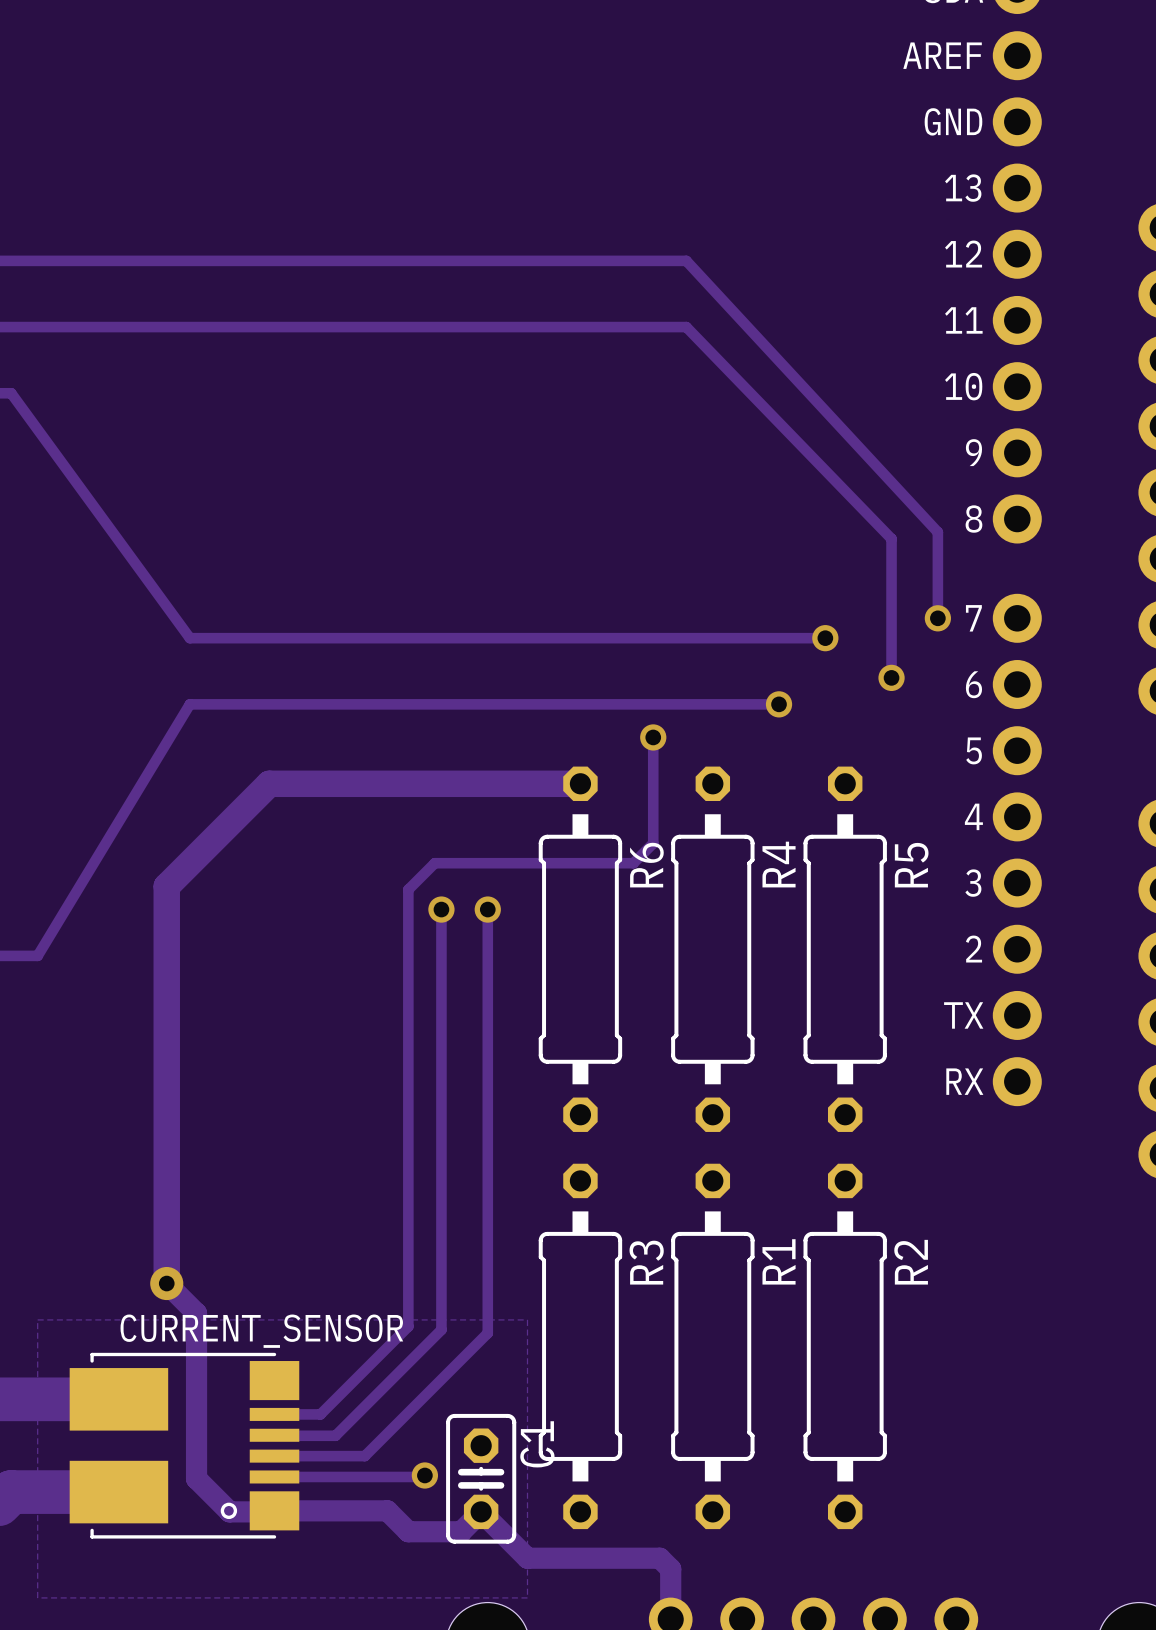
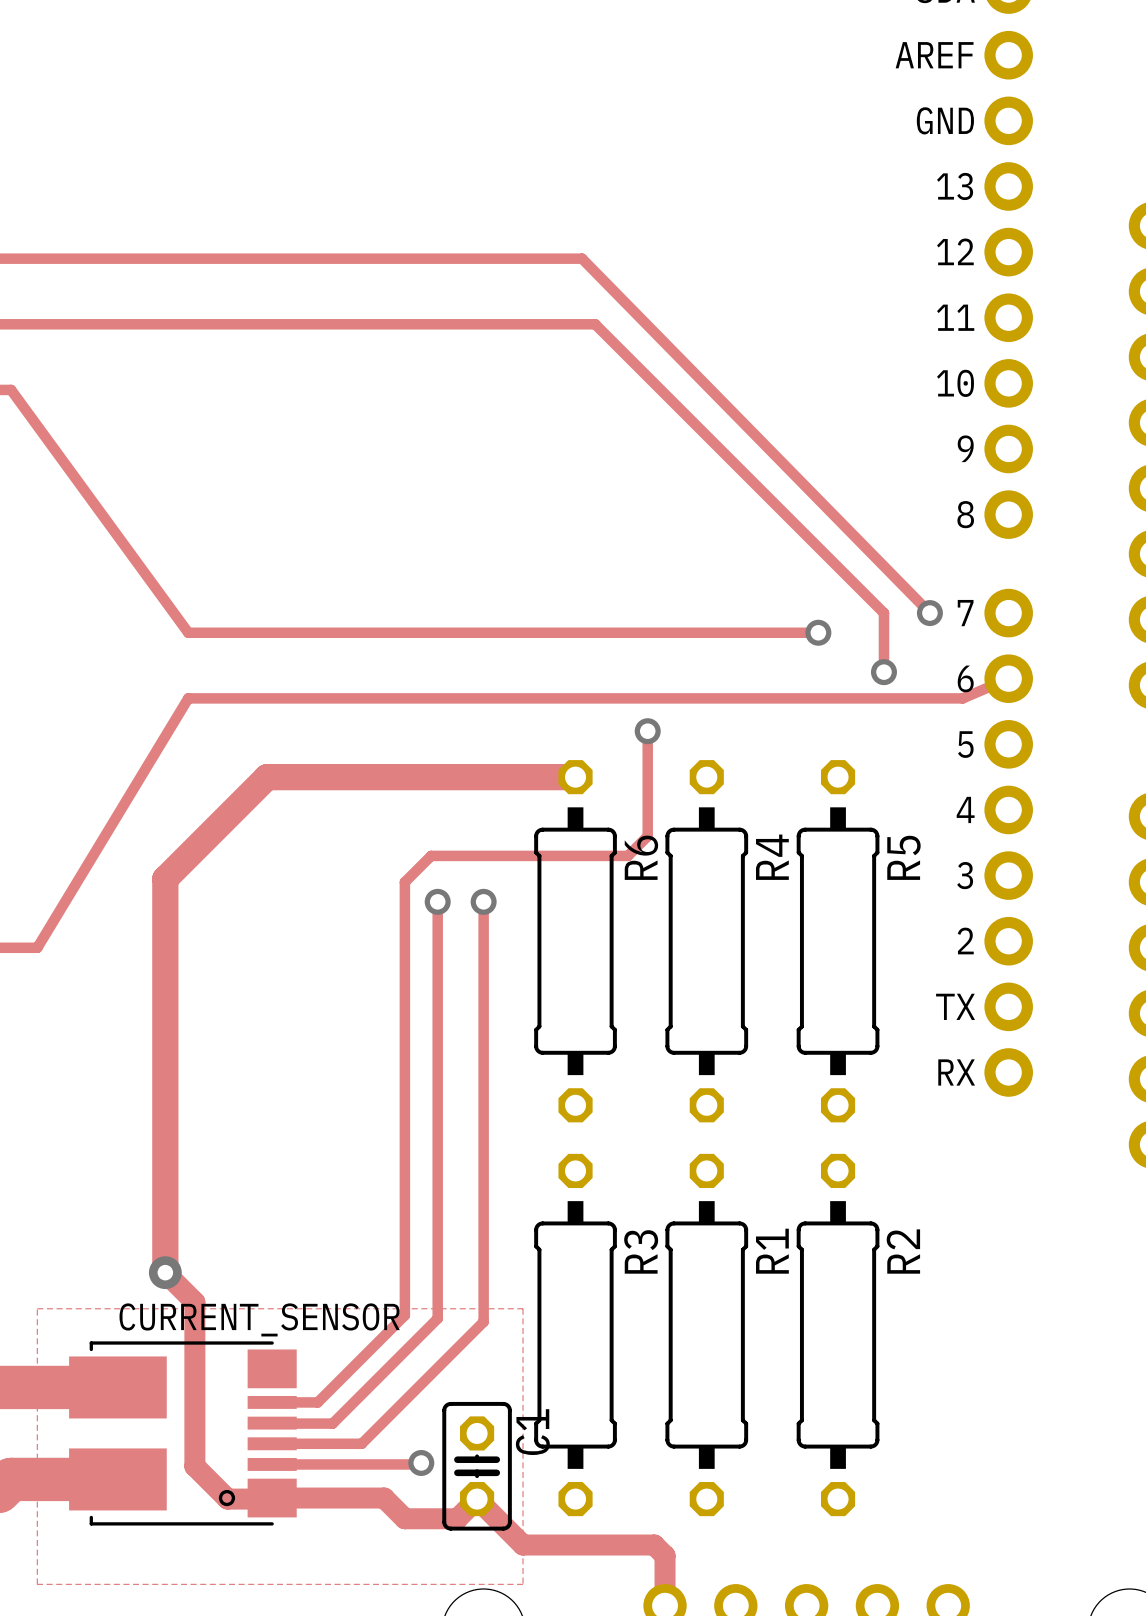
track: (587, 260) (686, 260) (937, 532) (937, 618) -> (582, 258) (929, 613)
track: (600, 327) (686, 327) (891, 538) (891, 618) -> (595, 324) (883, 613)
track: none -> (1008, 678) (962, 698) (772, 698)
via: (779, 704) -> none

